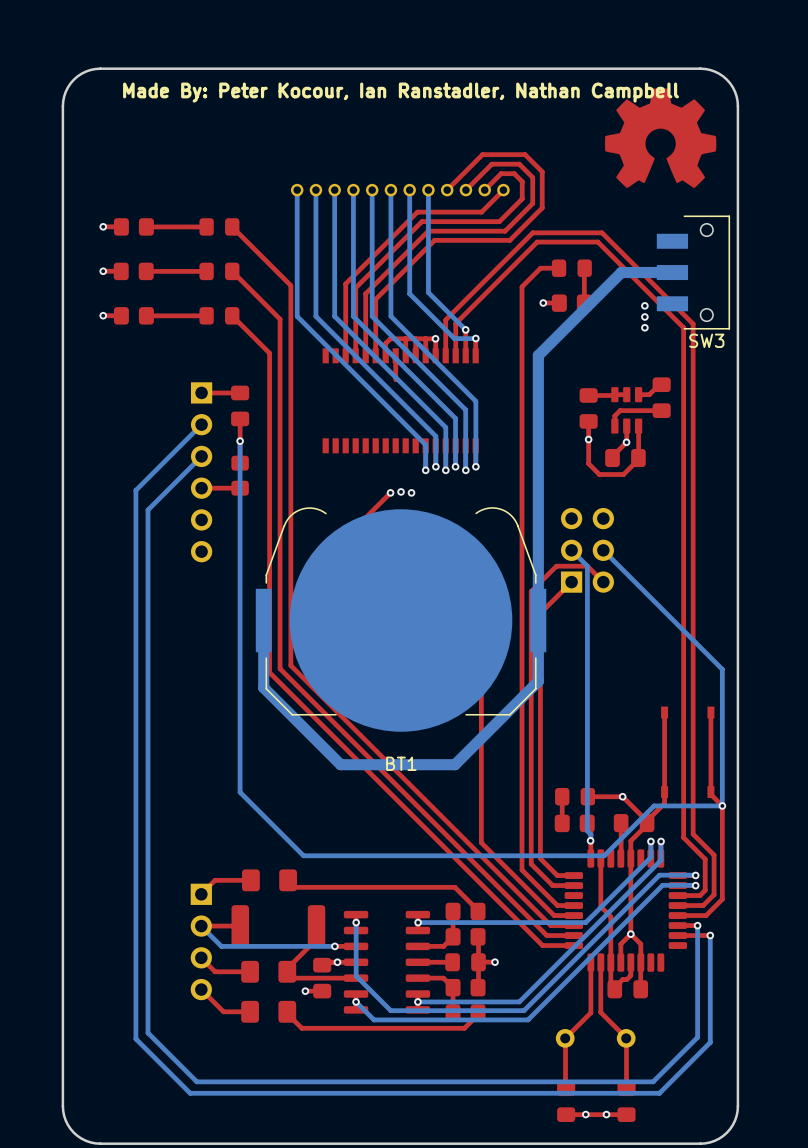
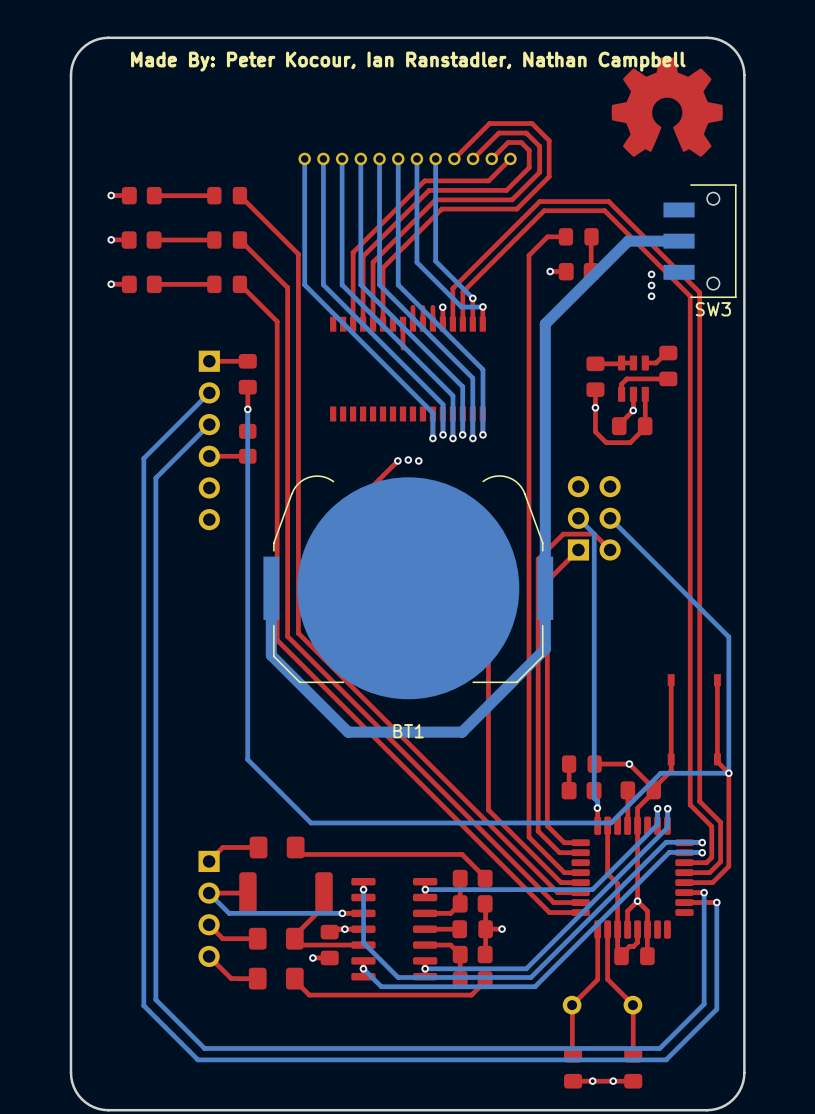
top track: (435, 338) (390, 338) (385, 343) (385, 355) -> none

